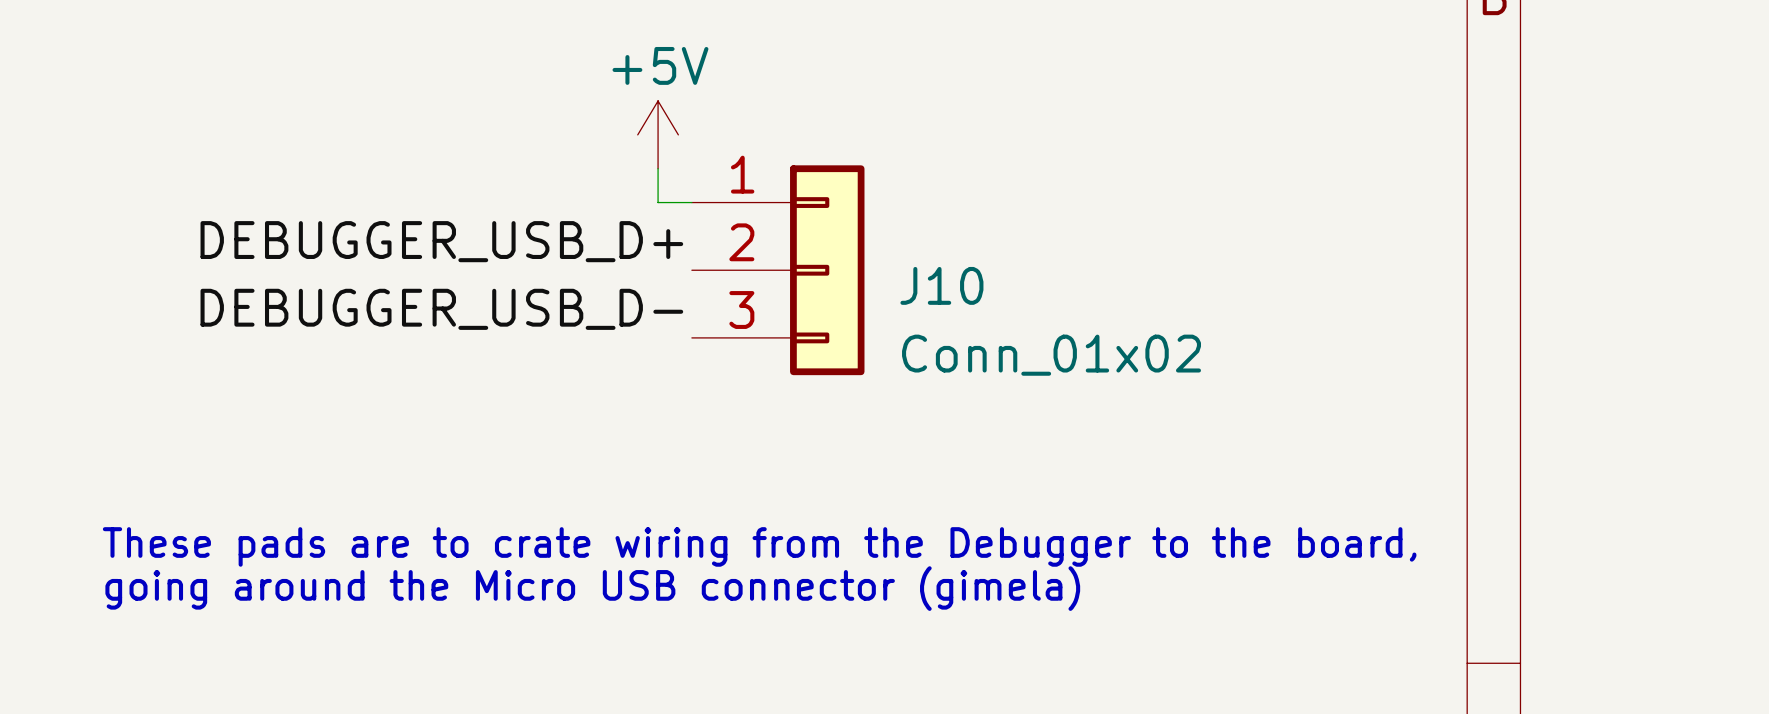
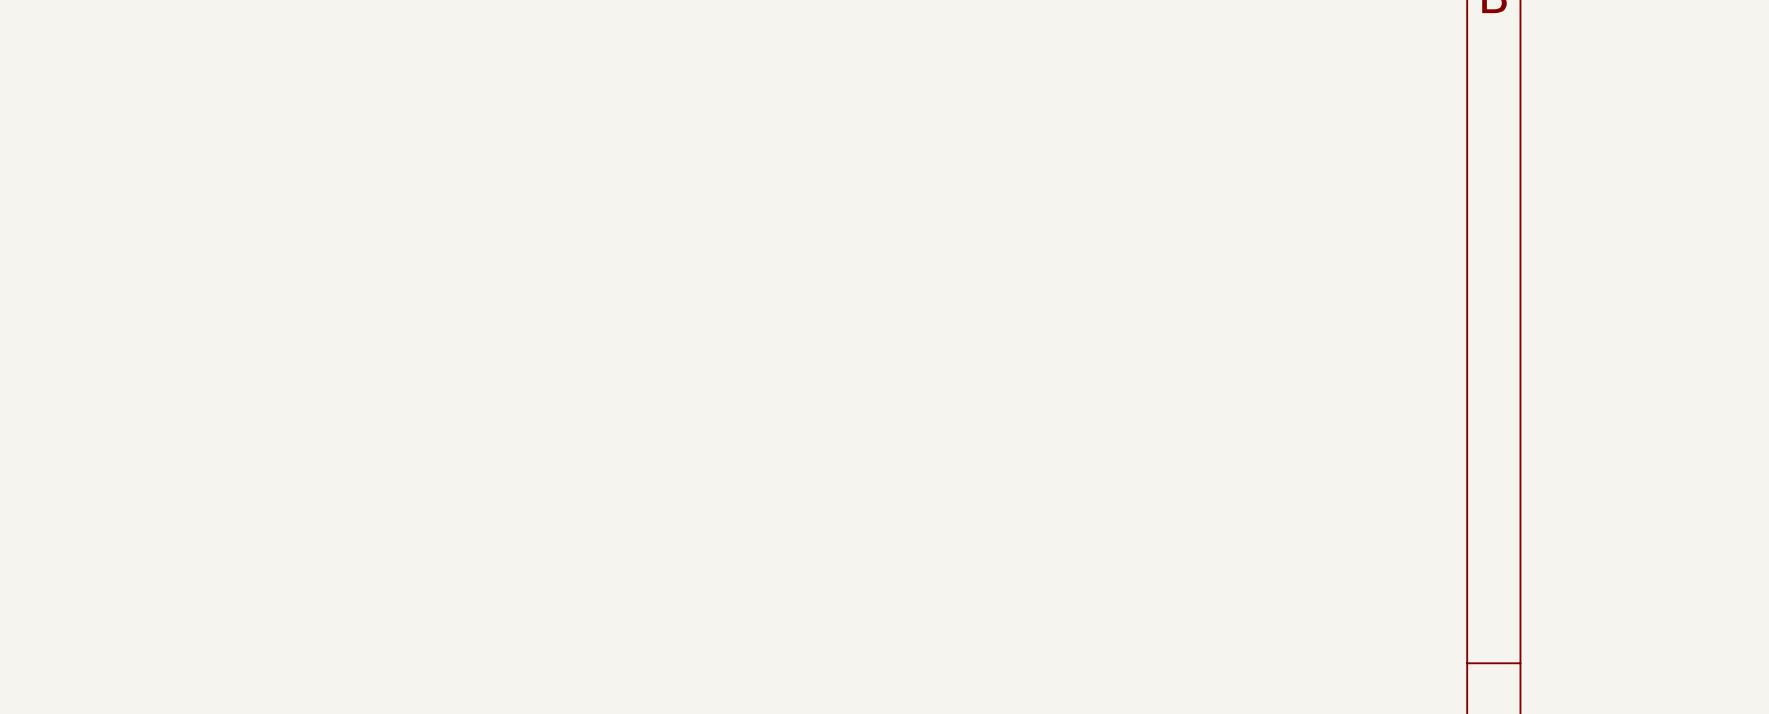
power symbol: +5V (658, 134) -> none
wire: (658, 168) (658, 202) (691, 202) -> none
label: DEBUGGER_USB_D+ (441, 241) -> none
J10: Conn_01x02 (778, 270) -> none
label: DEBUGGER_USB_D- (441, 309) -> none
text: These pads are to crate wiring from the Debugger to the board, (759, 546) -> none
text: going around the Micro USB connector (gimela) (592, 588) -> none

